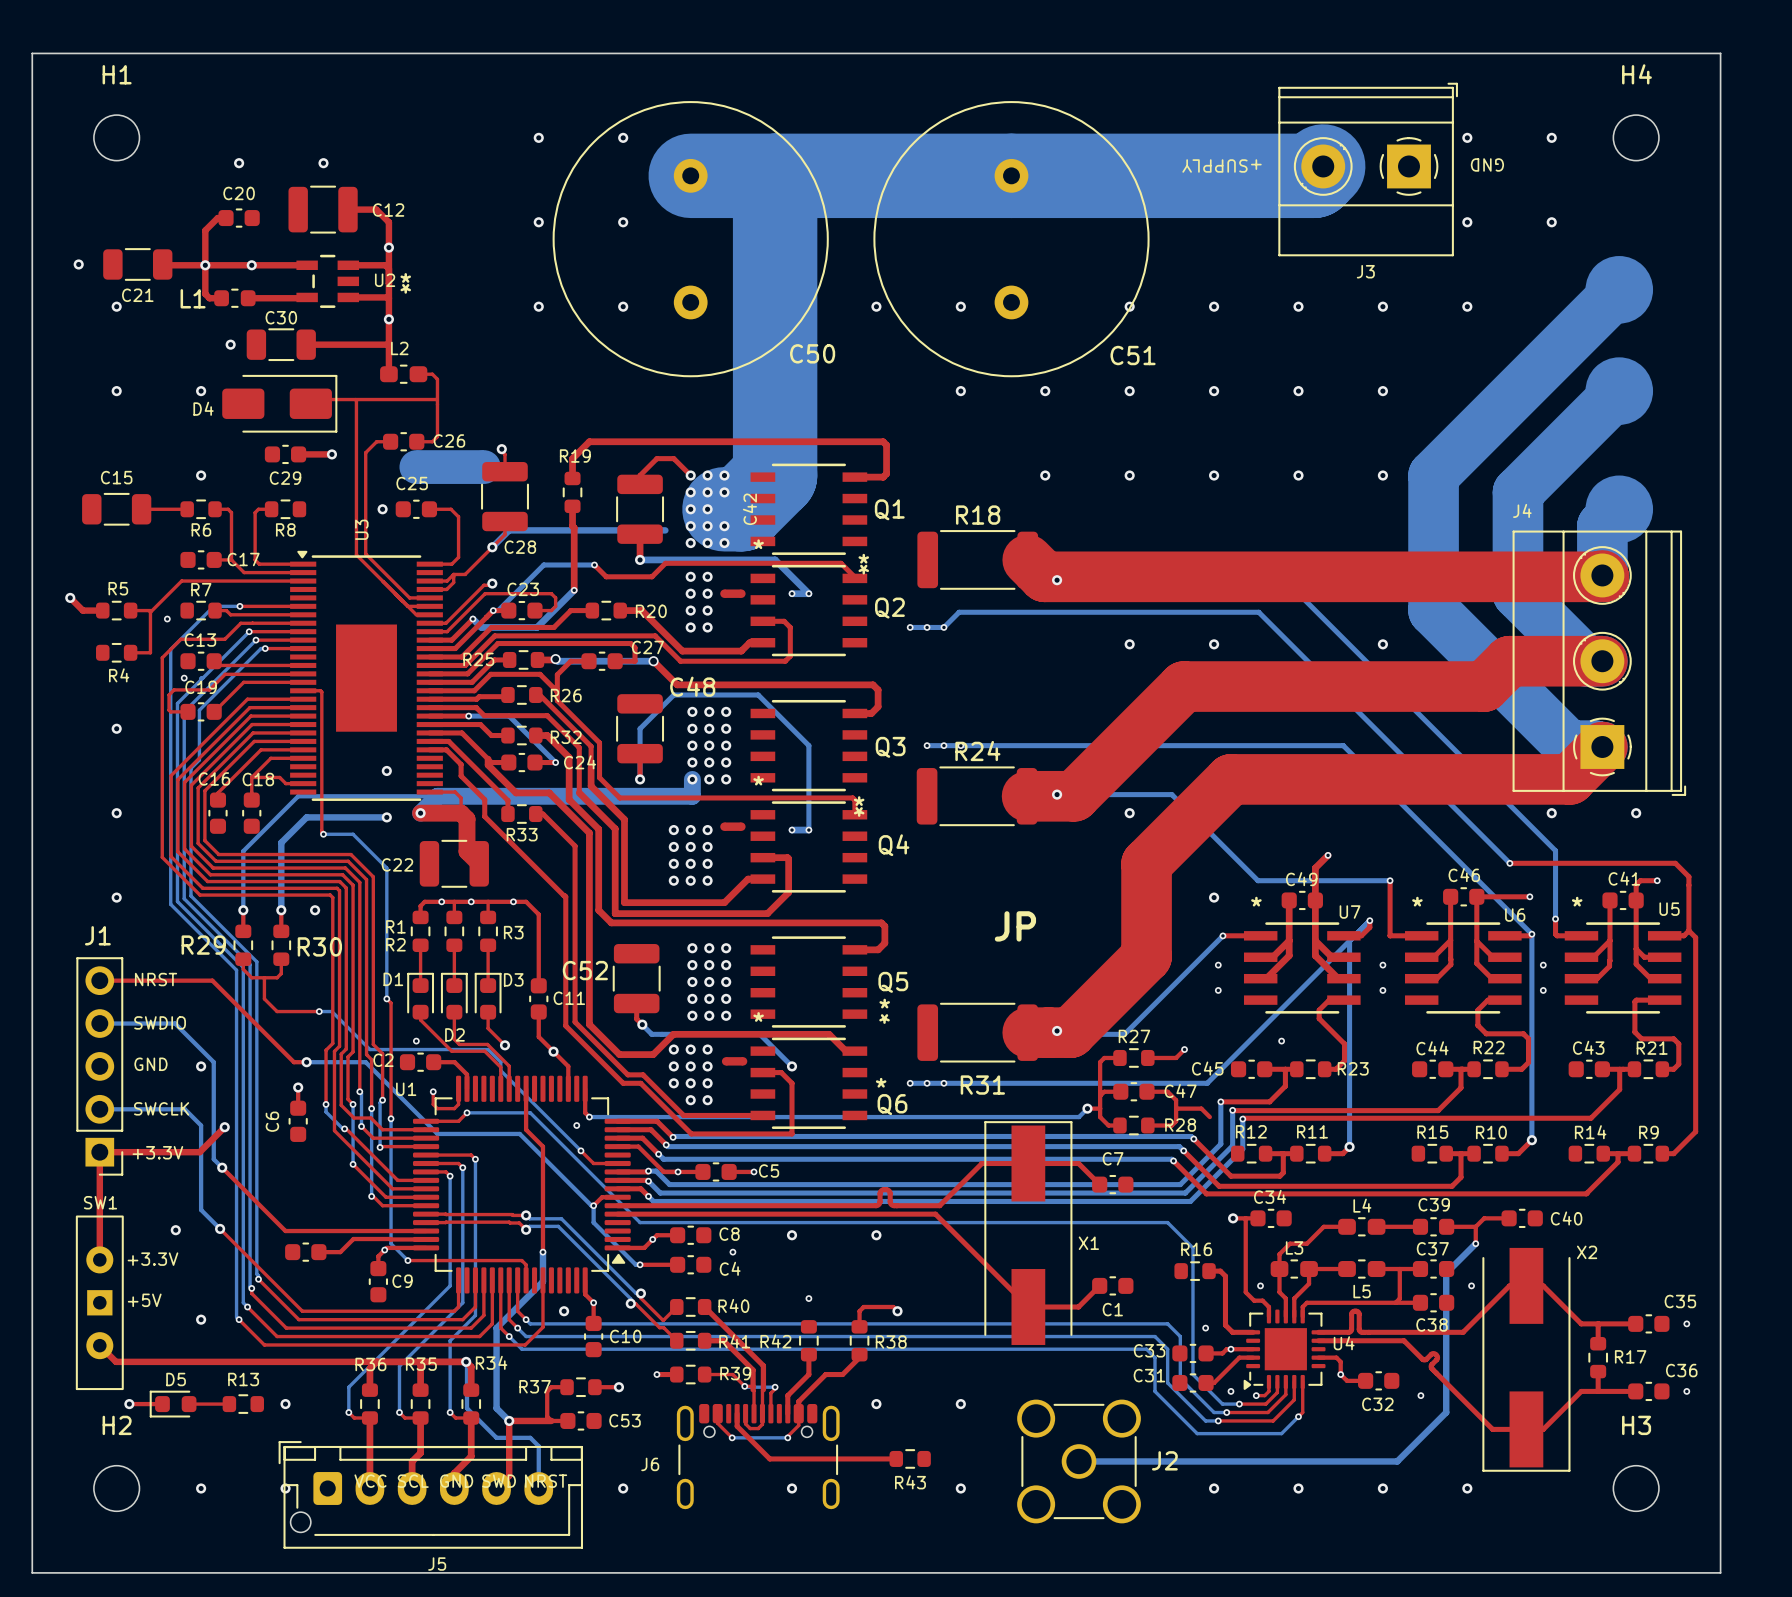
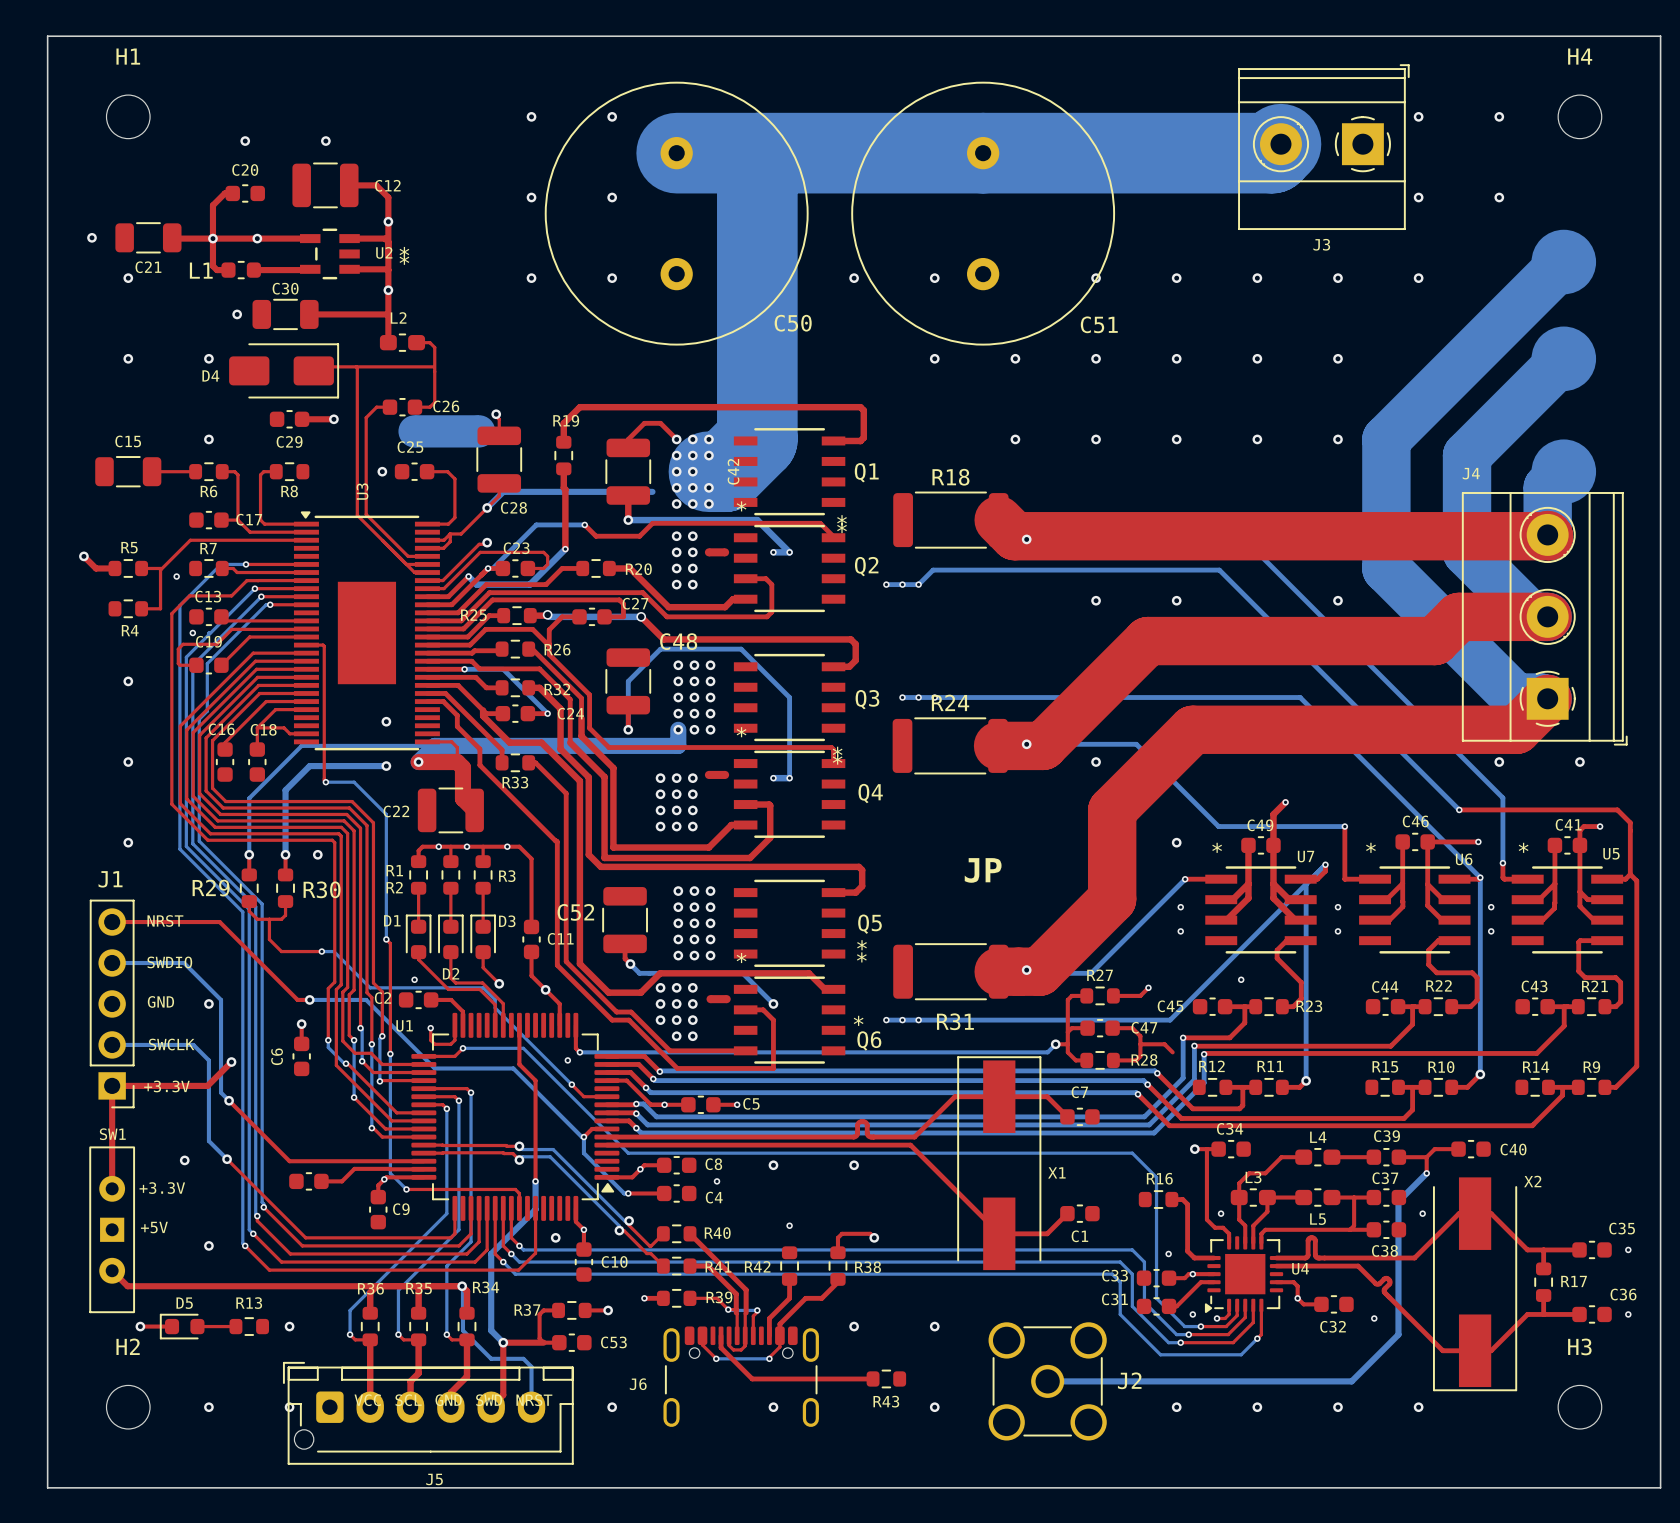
text: GND (1487, 164) -> none
text: +SUPPLY (1222, 165) -> none

